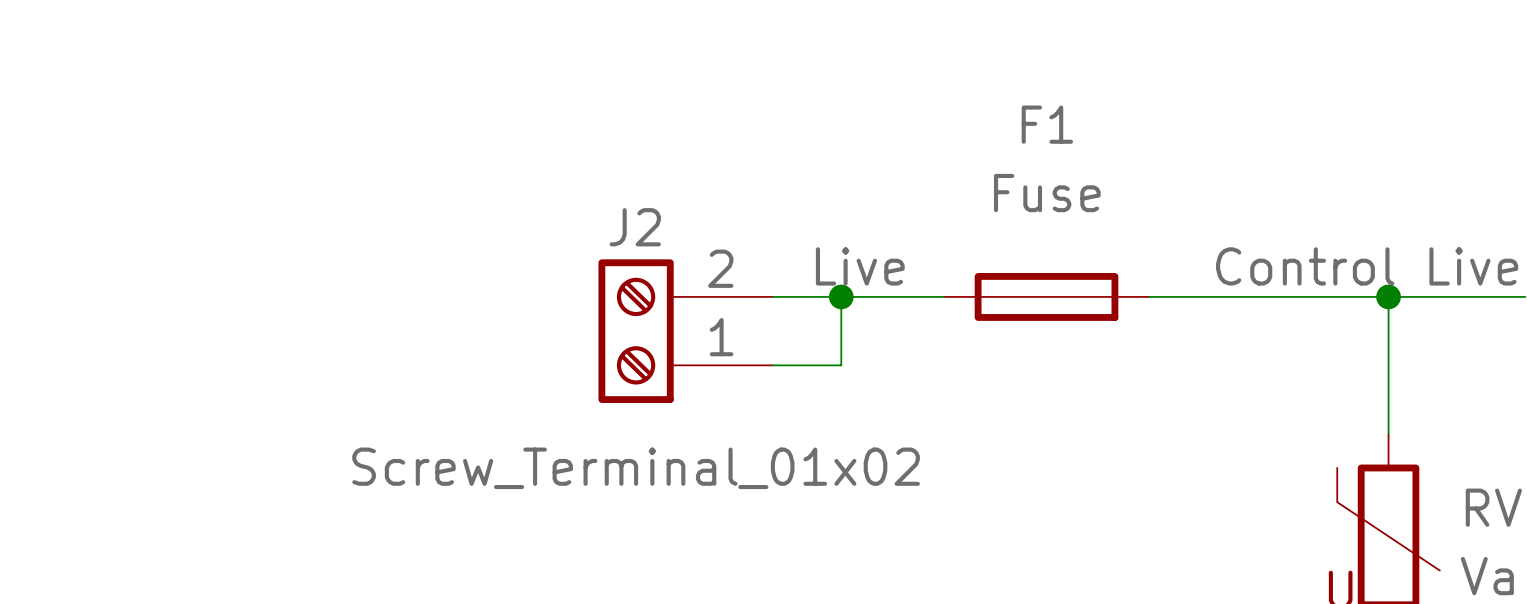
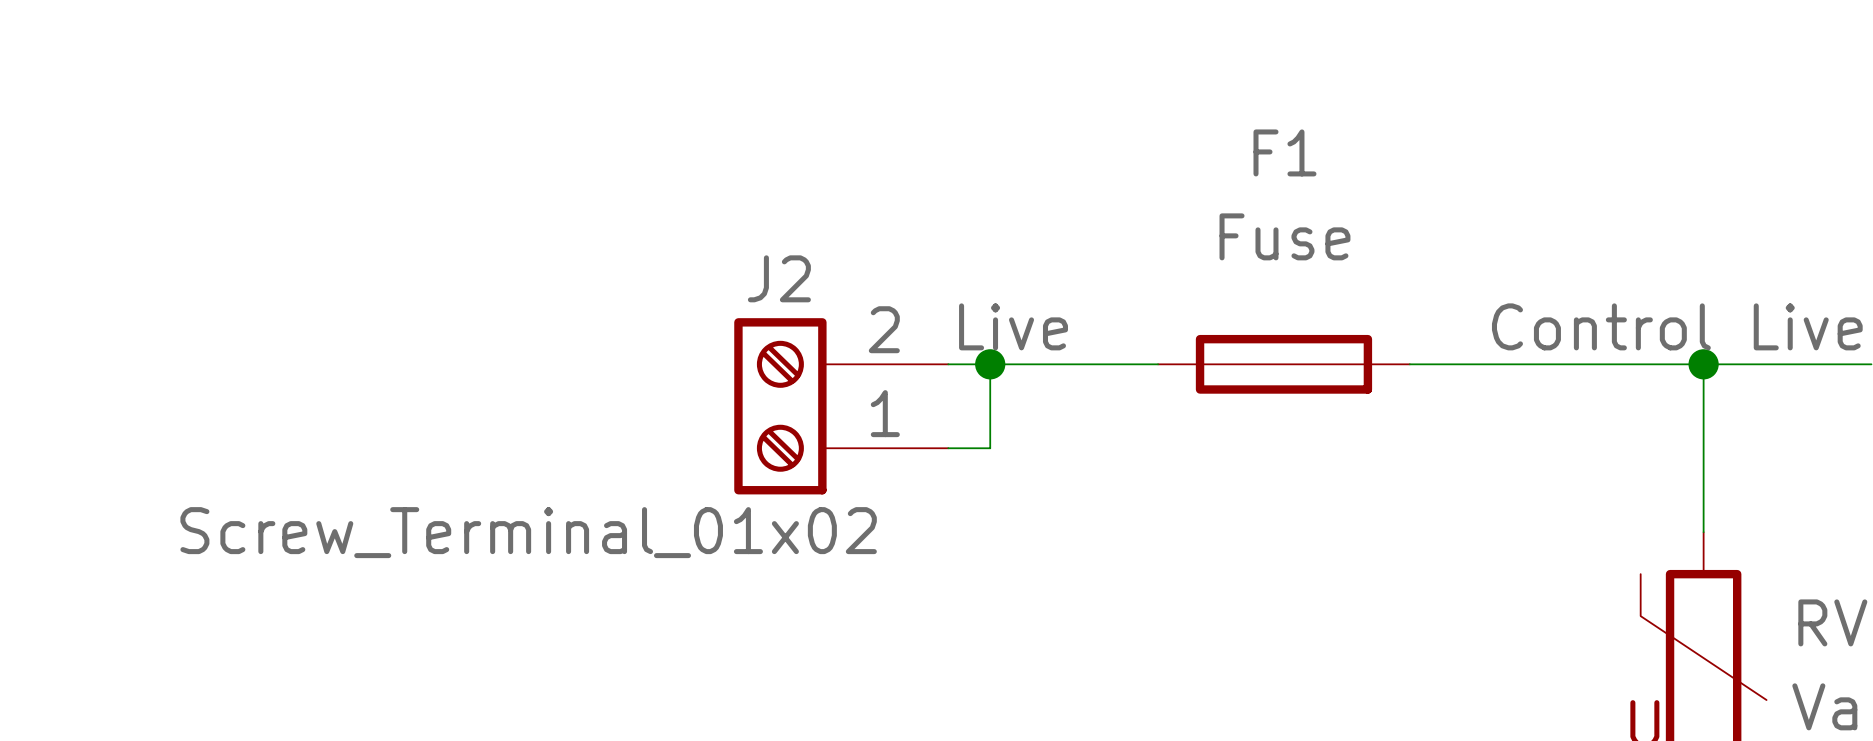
label position: Live (860, 266) -> Live (1013, 326)
wire: (841, 296) (841, 365) (807, 365) -> (990, 364) (990, 448)
junction position: (841, 296) -> (990, 364)
J2 value position: Screw_Terminal_01x02 (636, 468) -> Screw_Terminal_01x02 (528, 532)

